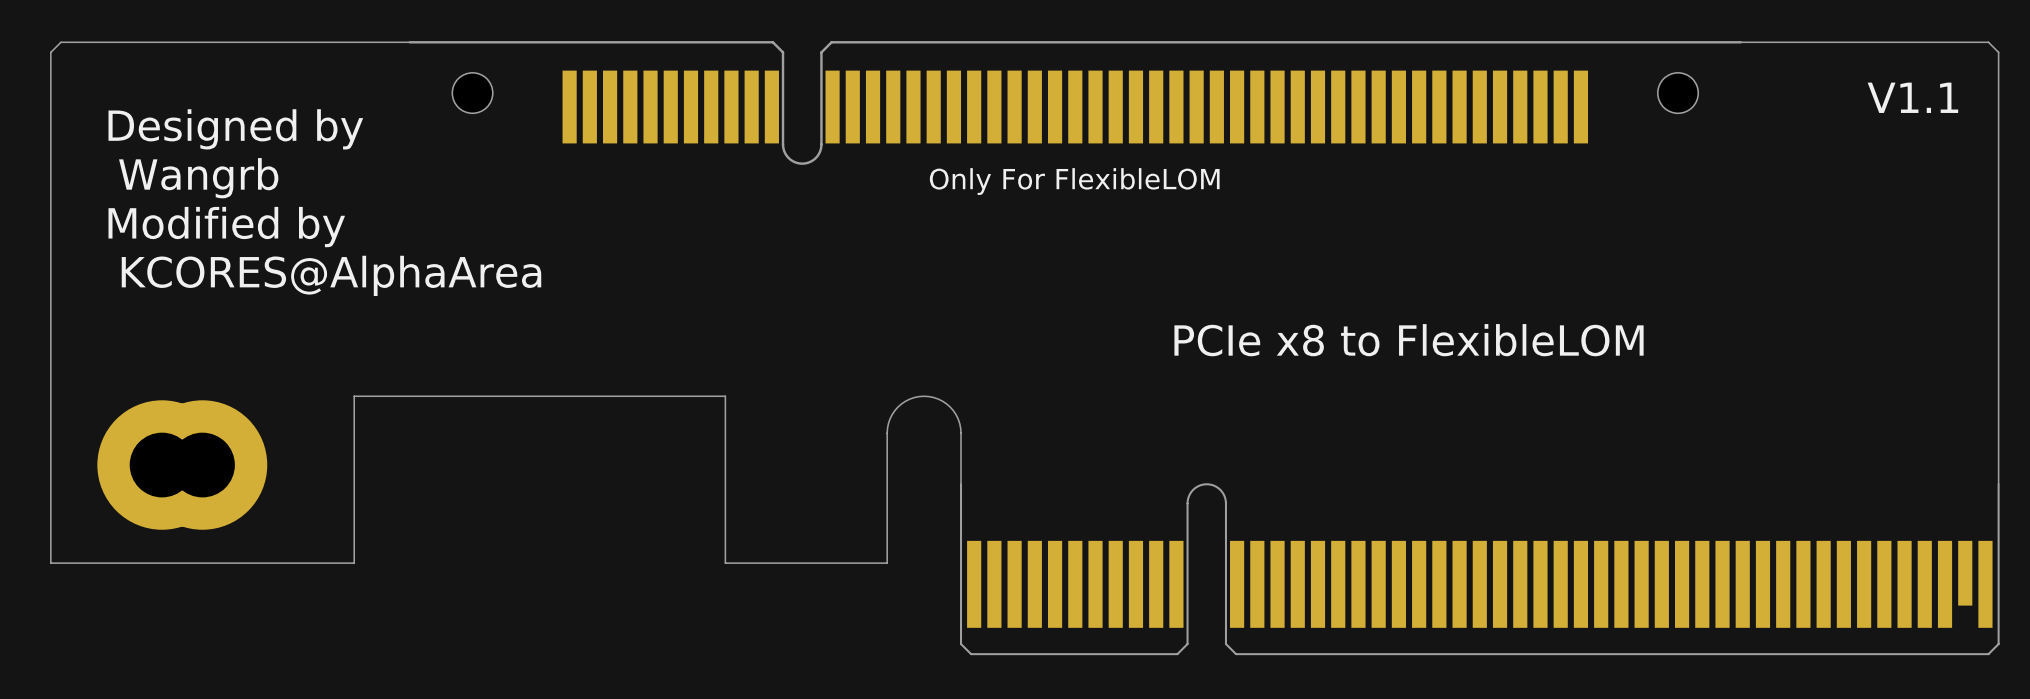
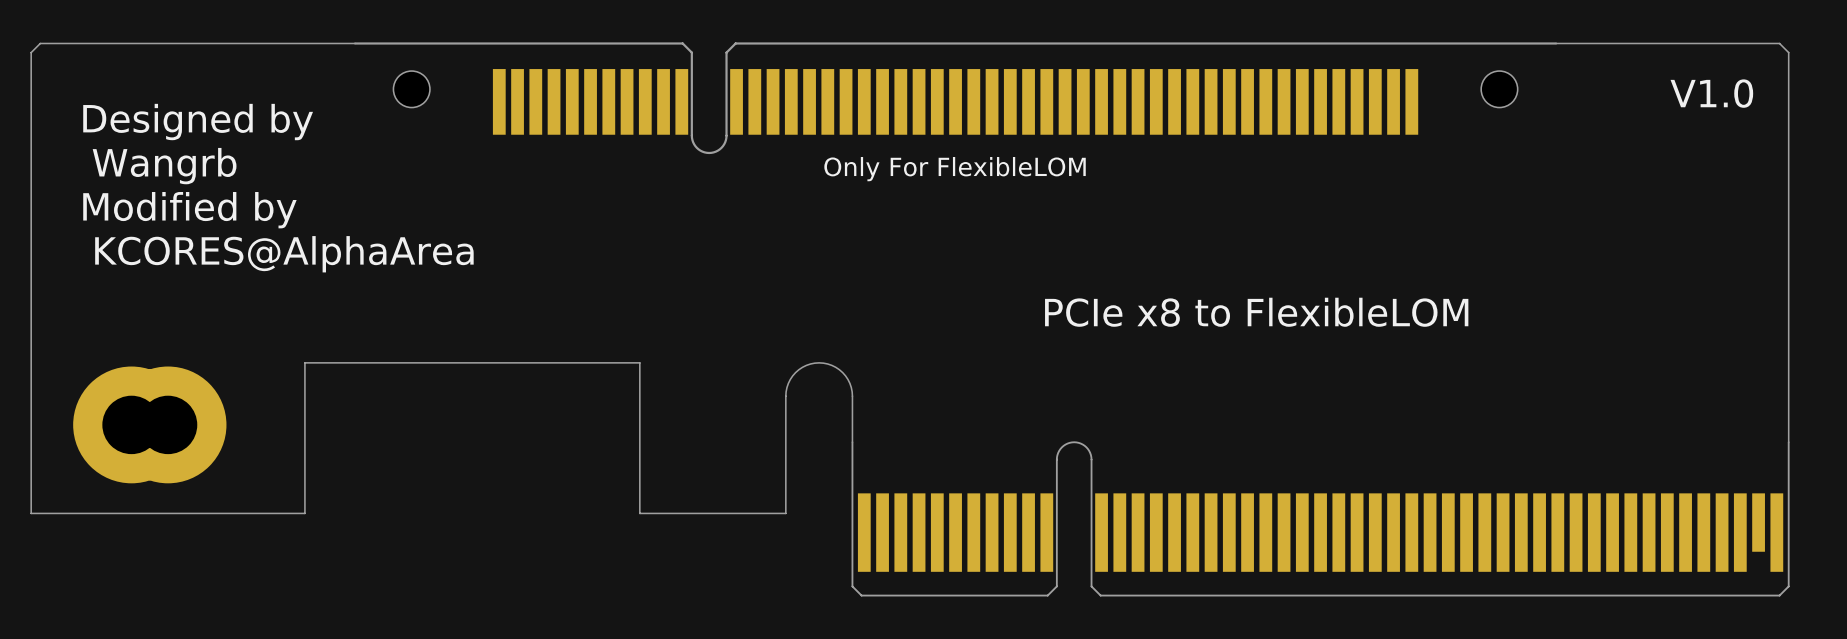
text: V1.1 (1912, 97) -> V1.0 (1711, 93)

